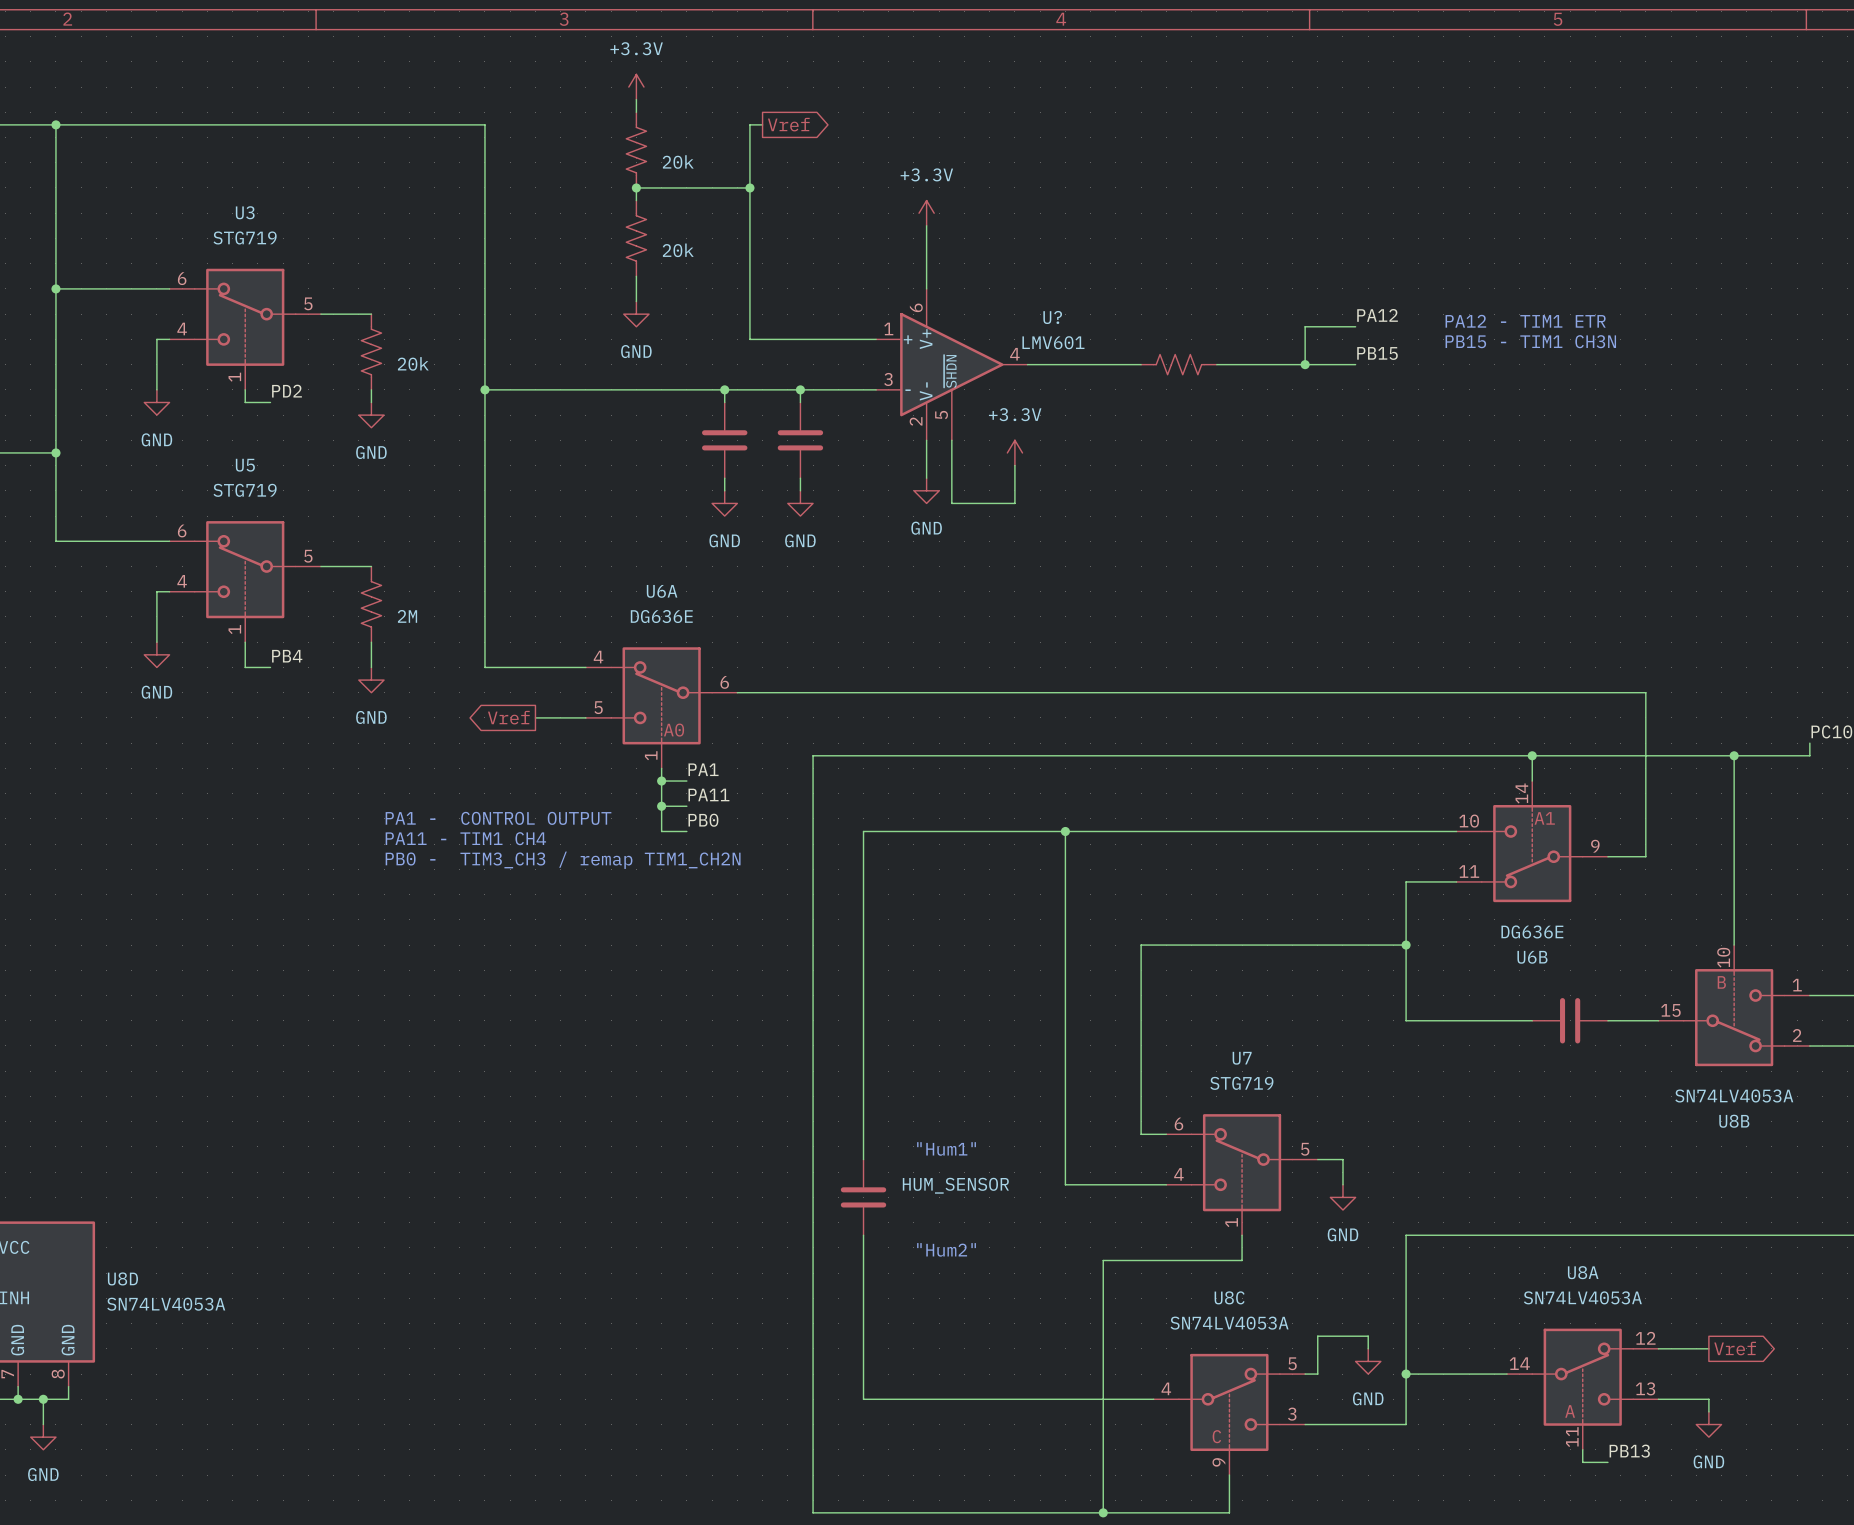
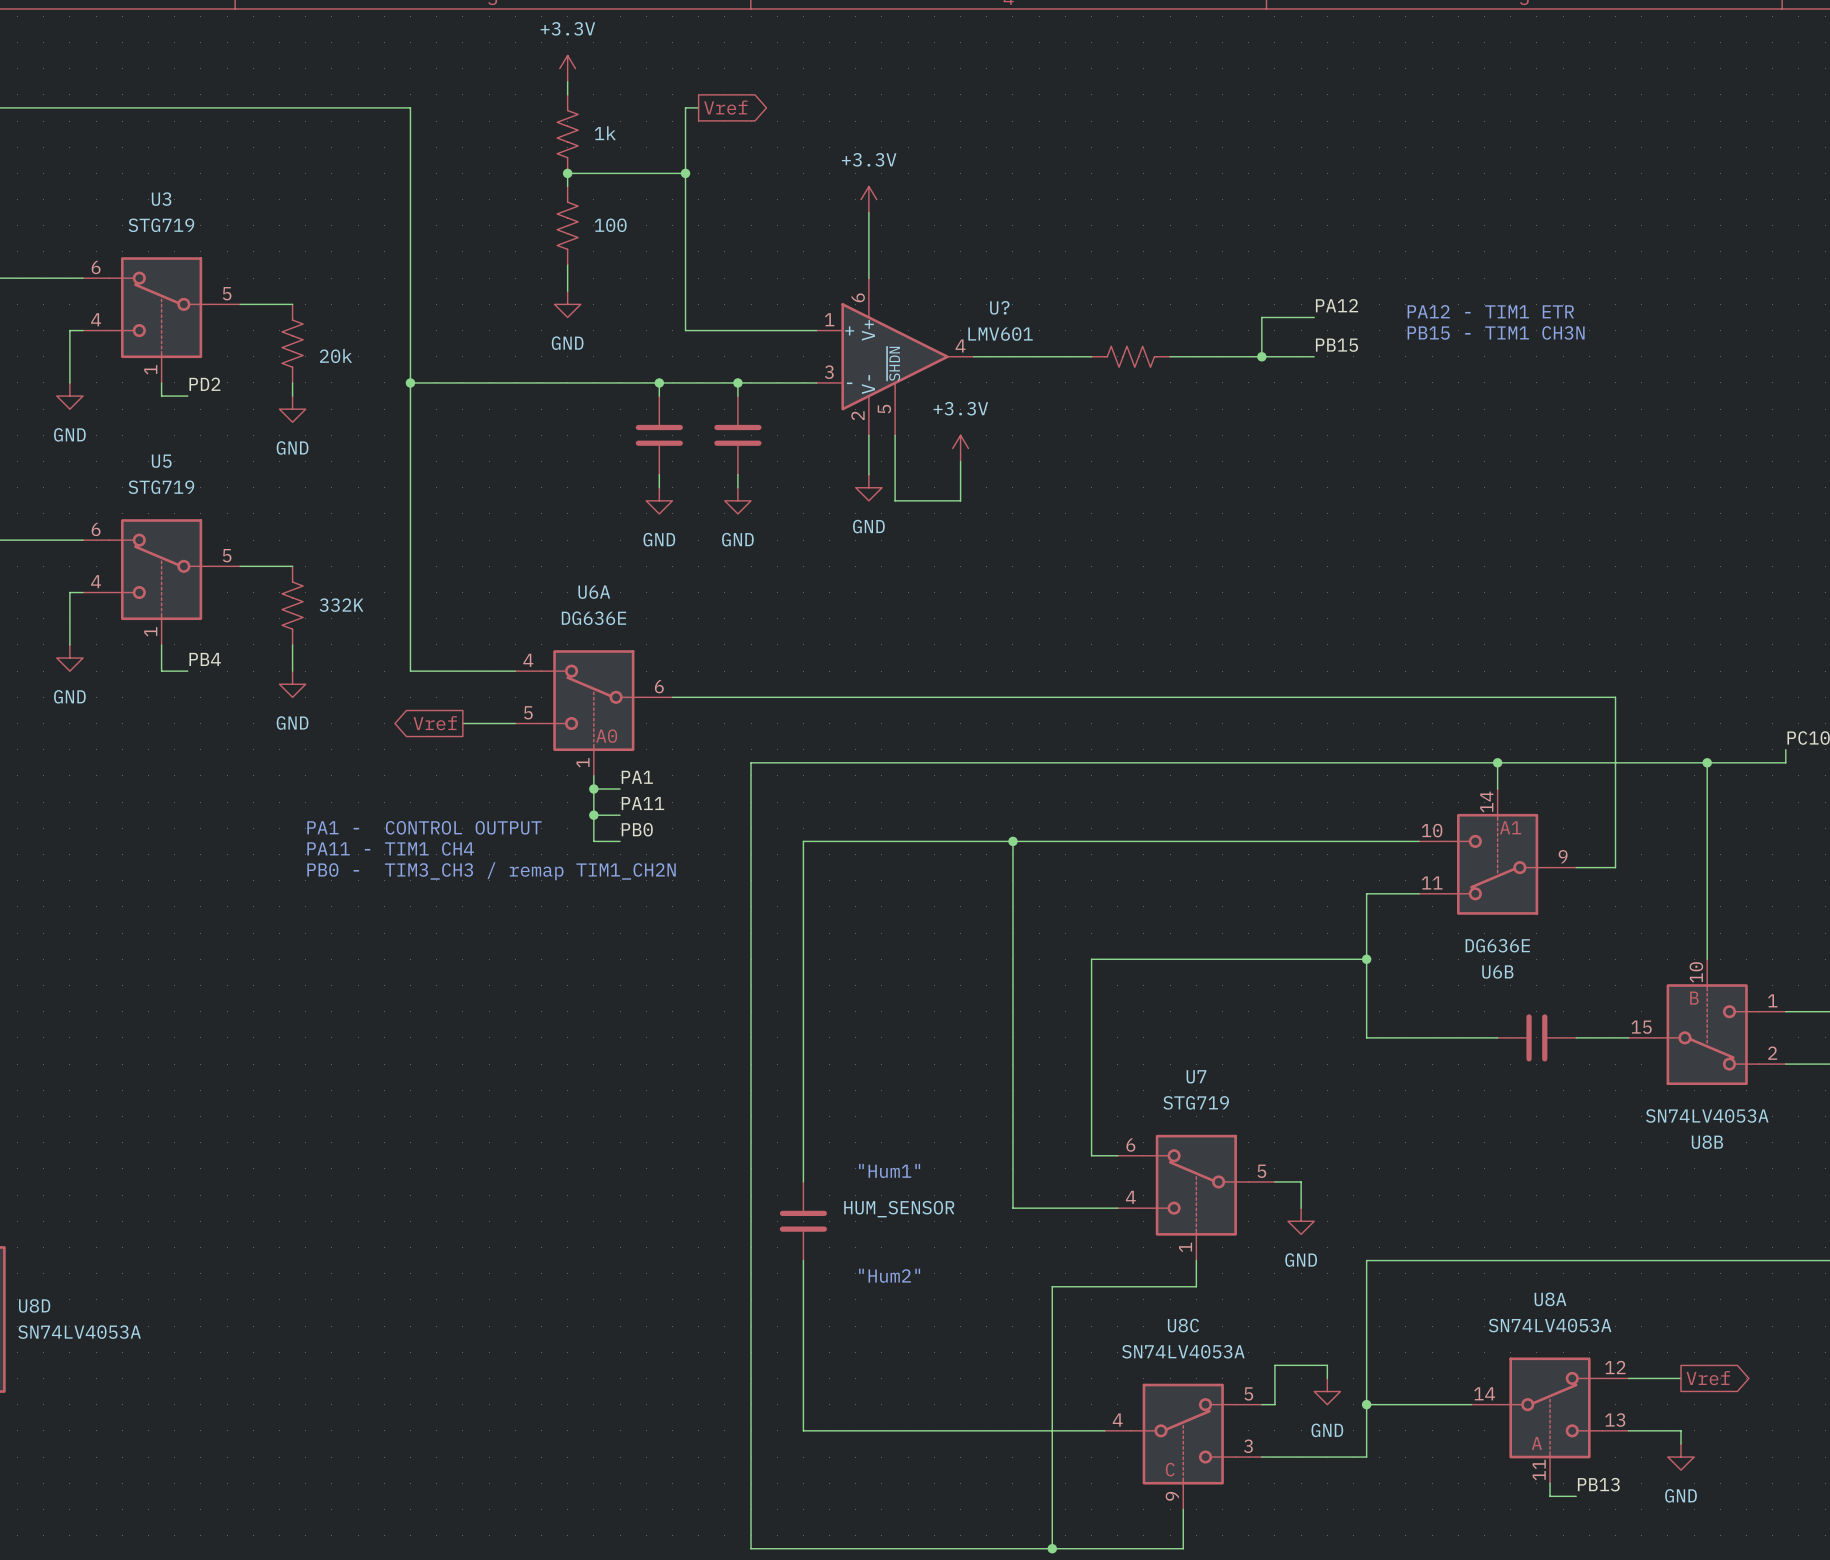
part value: 20k (678, 162) -> 1k (605, 133)
part value: 20k (678, 250) -> 100 (610, 225)
part value: 2M (407, 616) -> 332K (341, 605)

